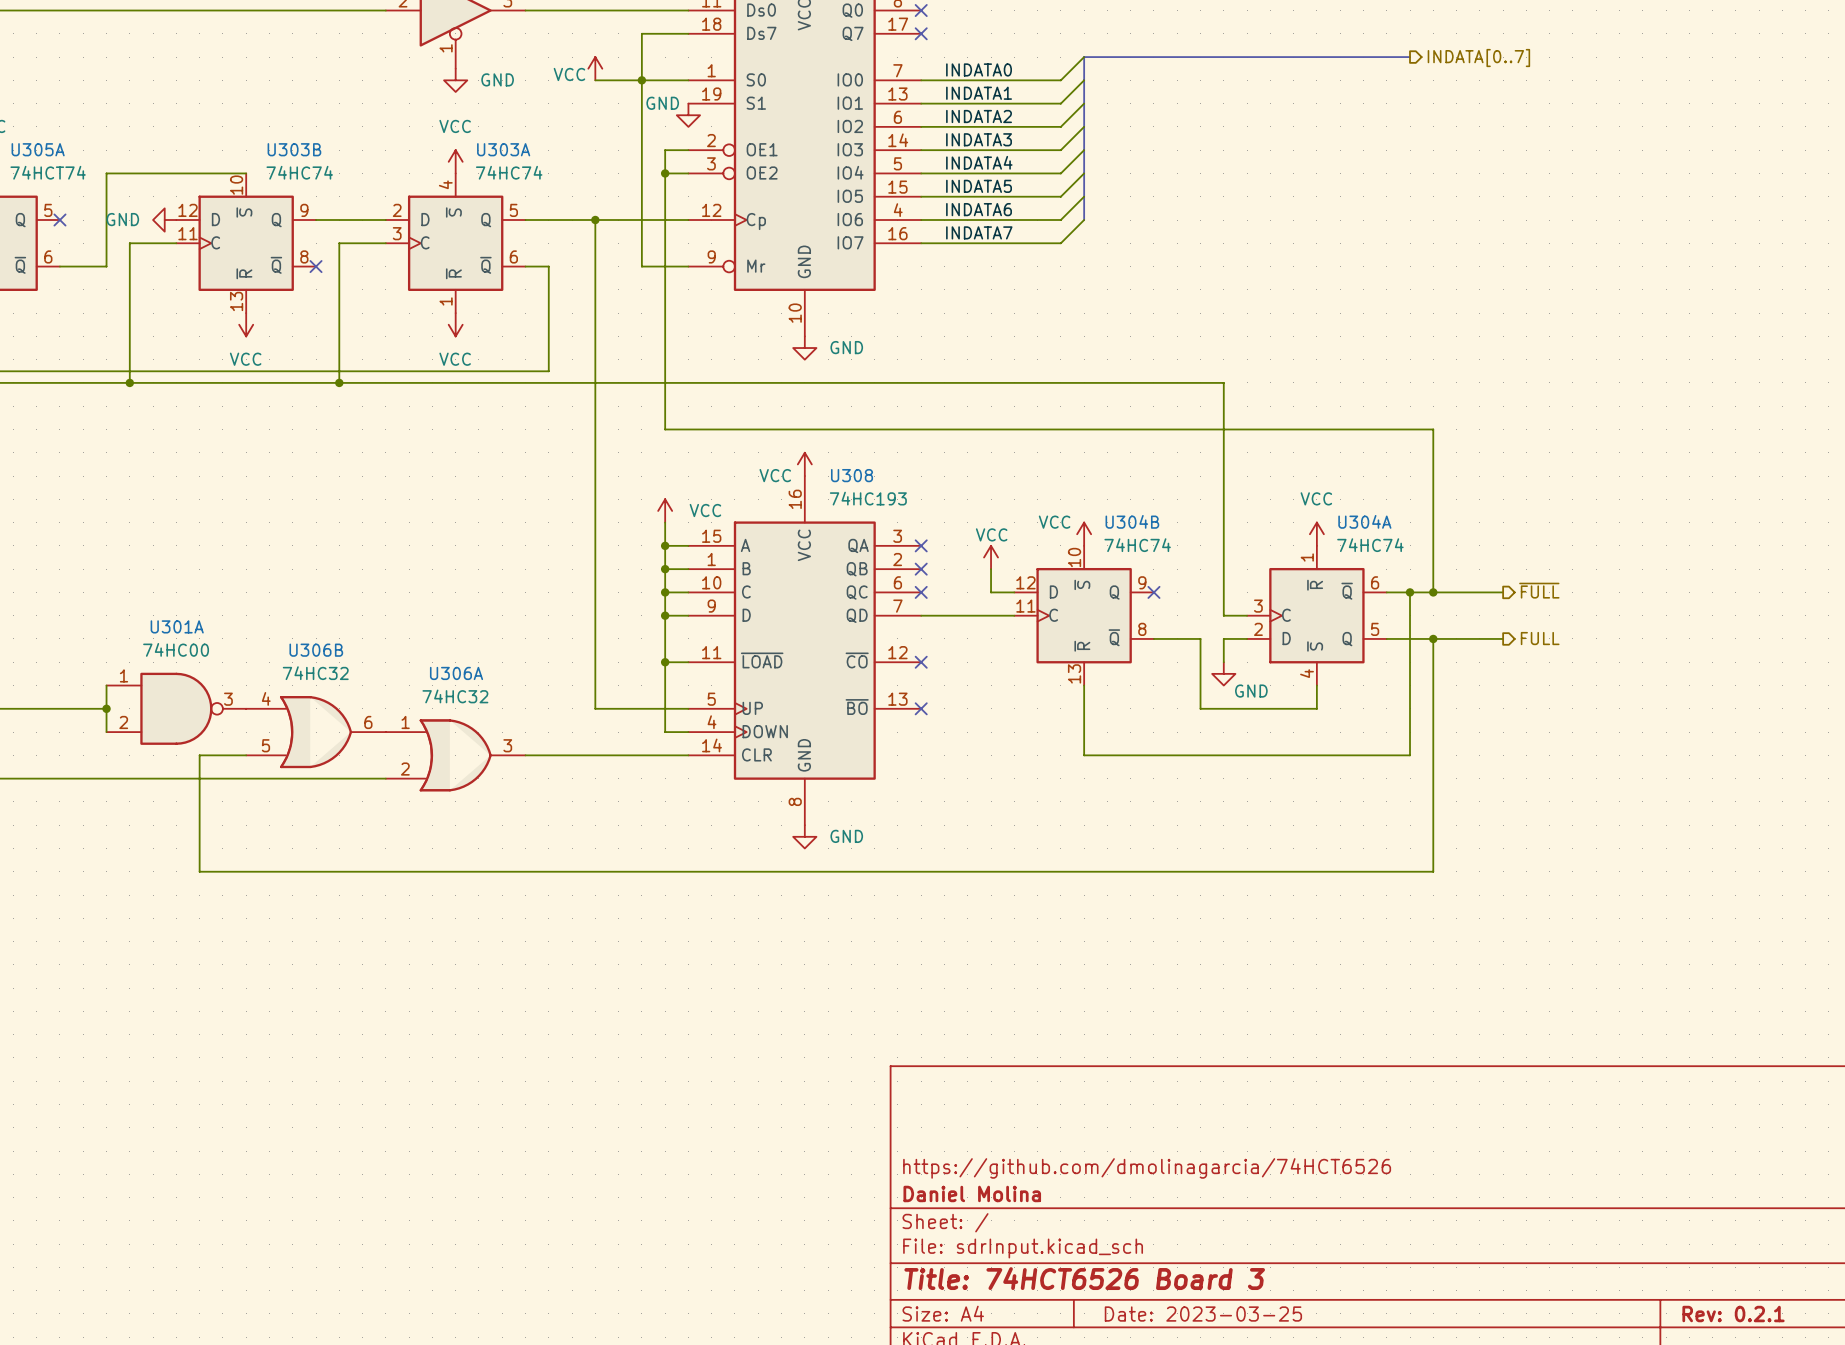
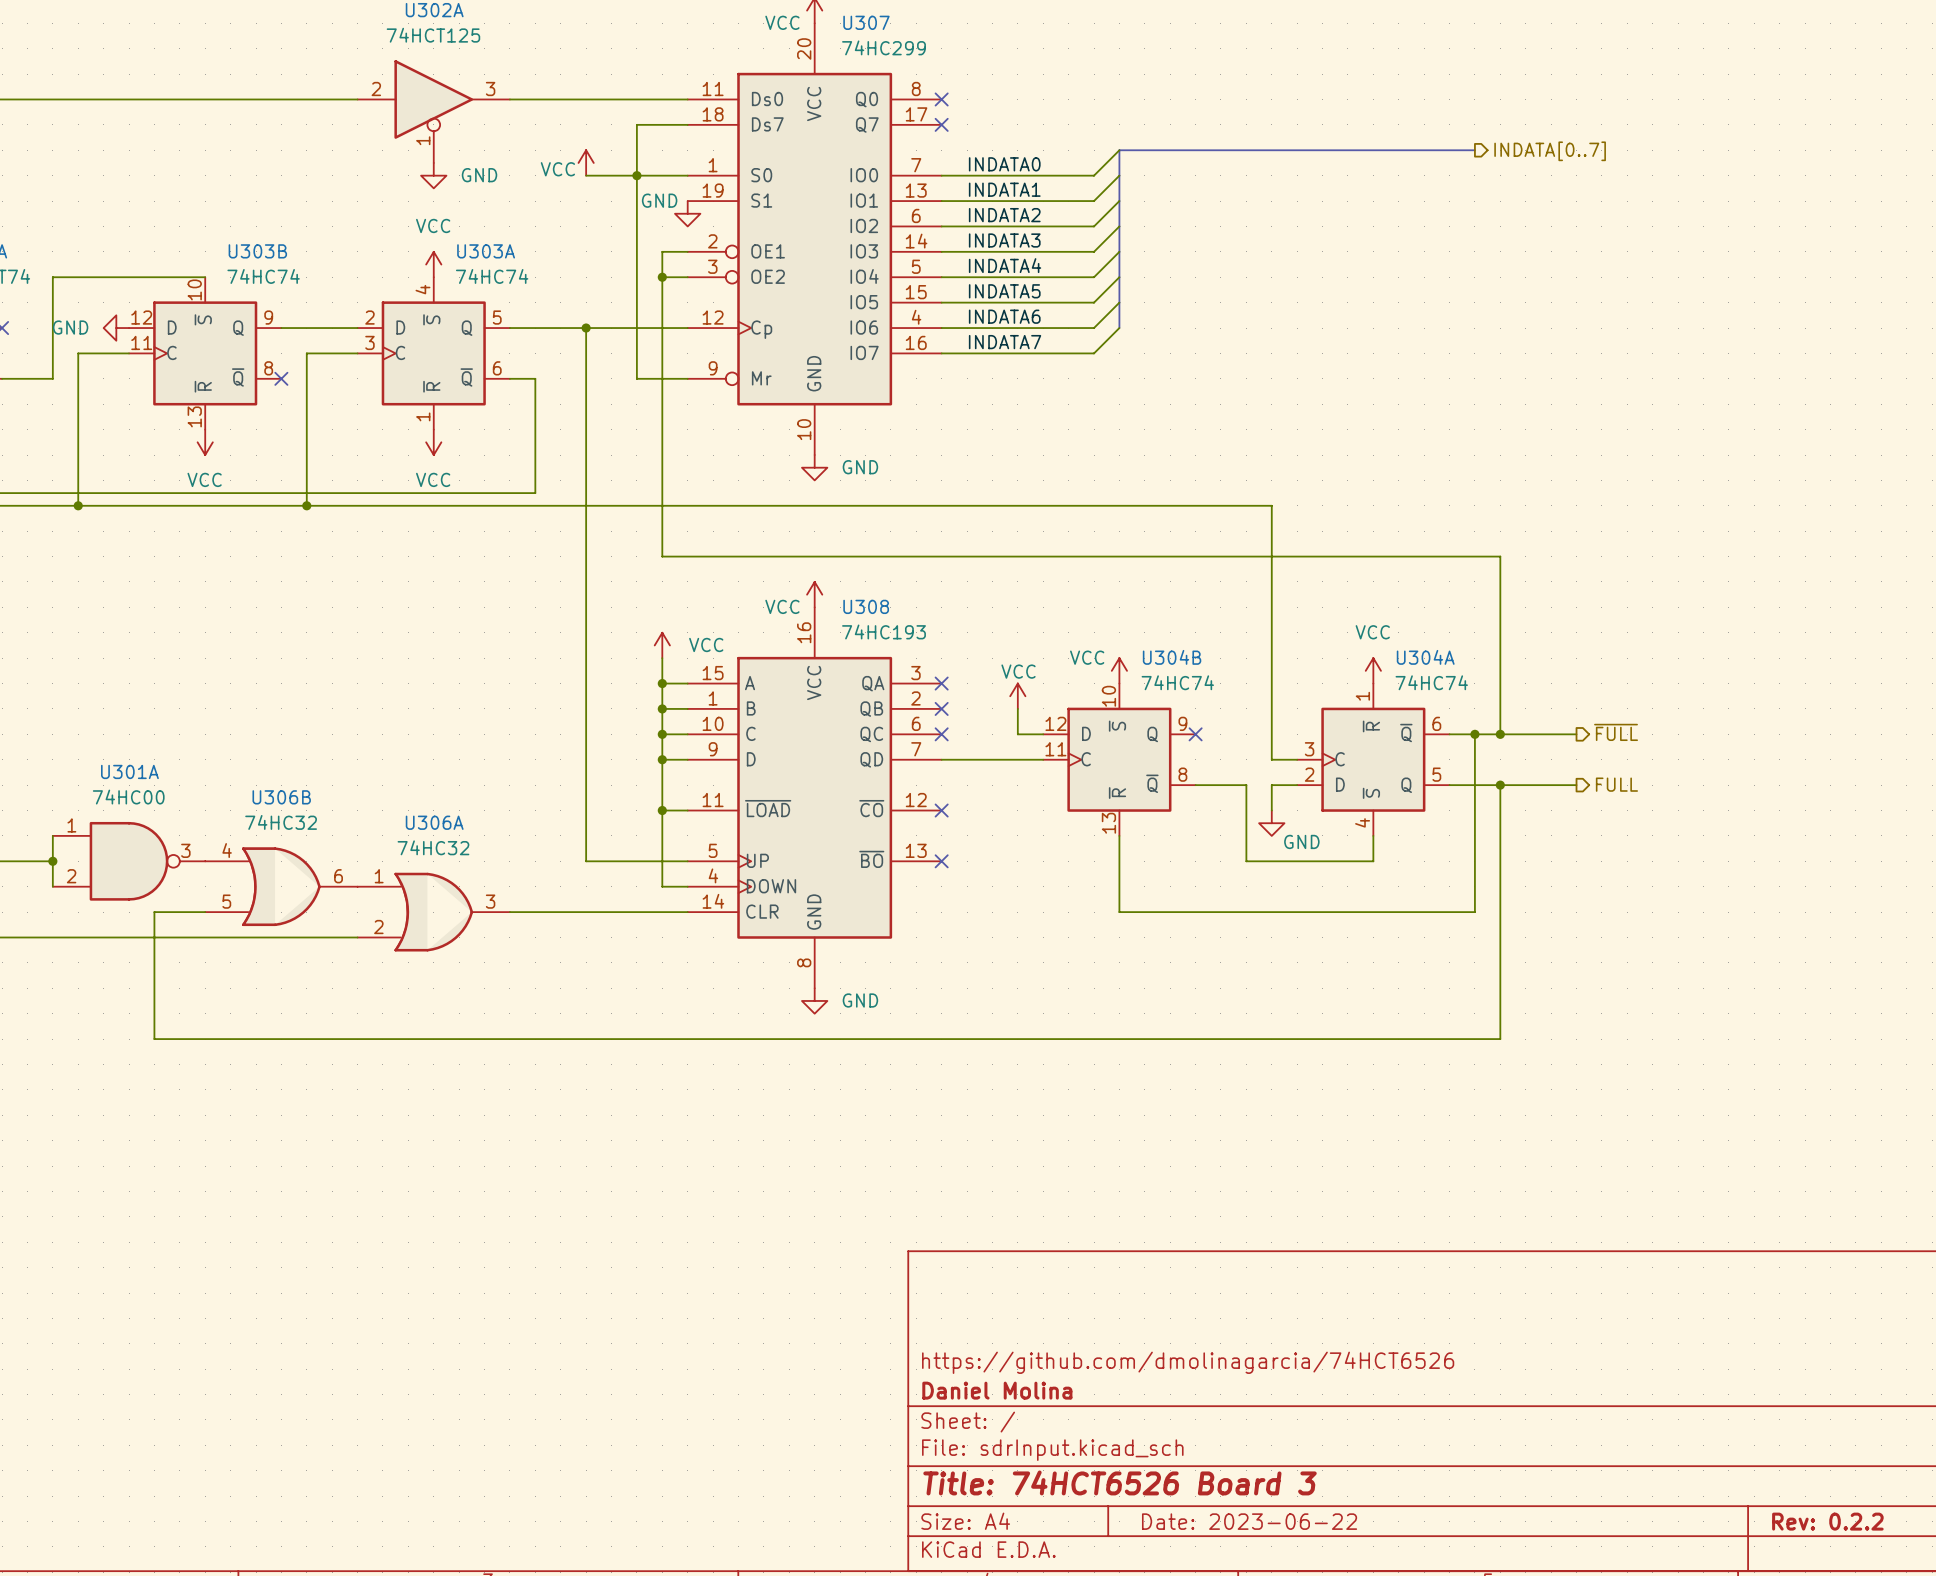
title block: Date: 2023-03-25 (1203, 1314) -> Date: 2023-06-22 (1249, 1521)
title block: Rev: 0.2.1 (1733, 1314) -> Rev: 0.2.2 (1827, 1521)

